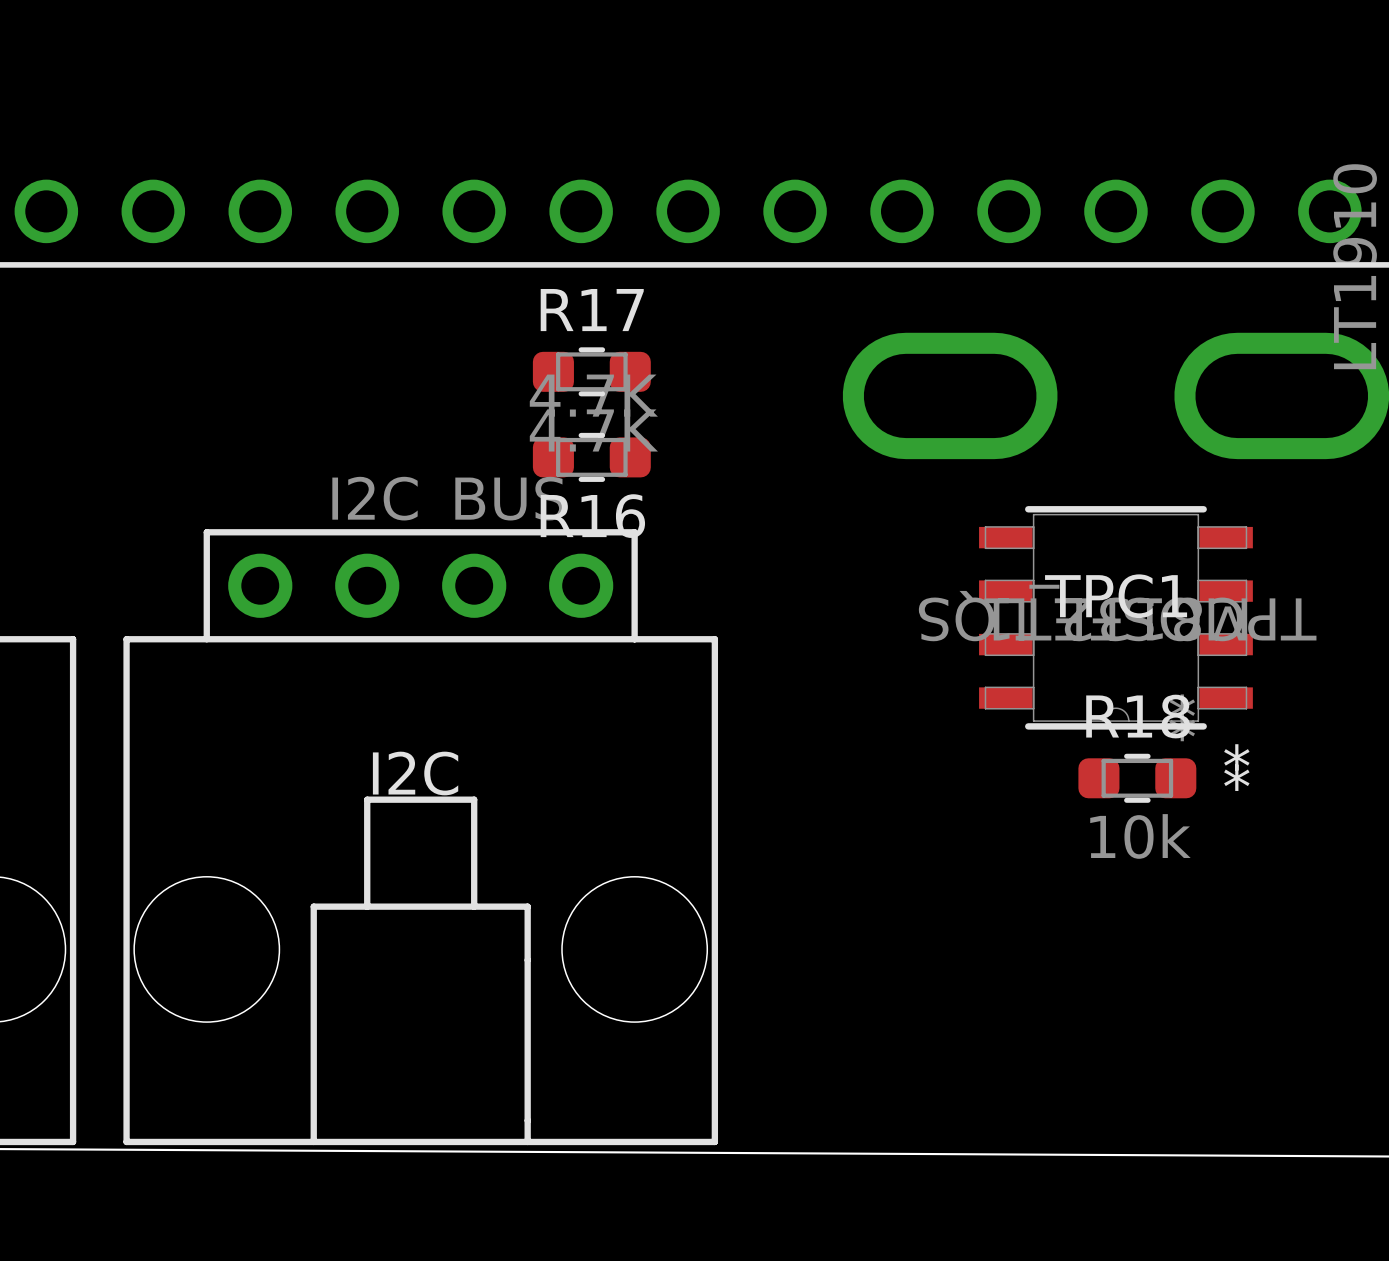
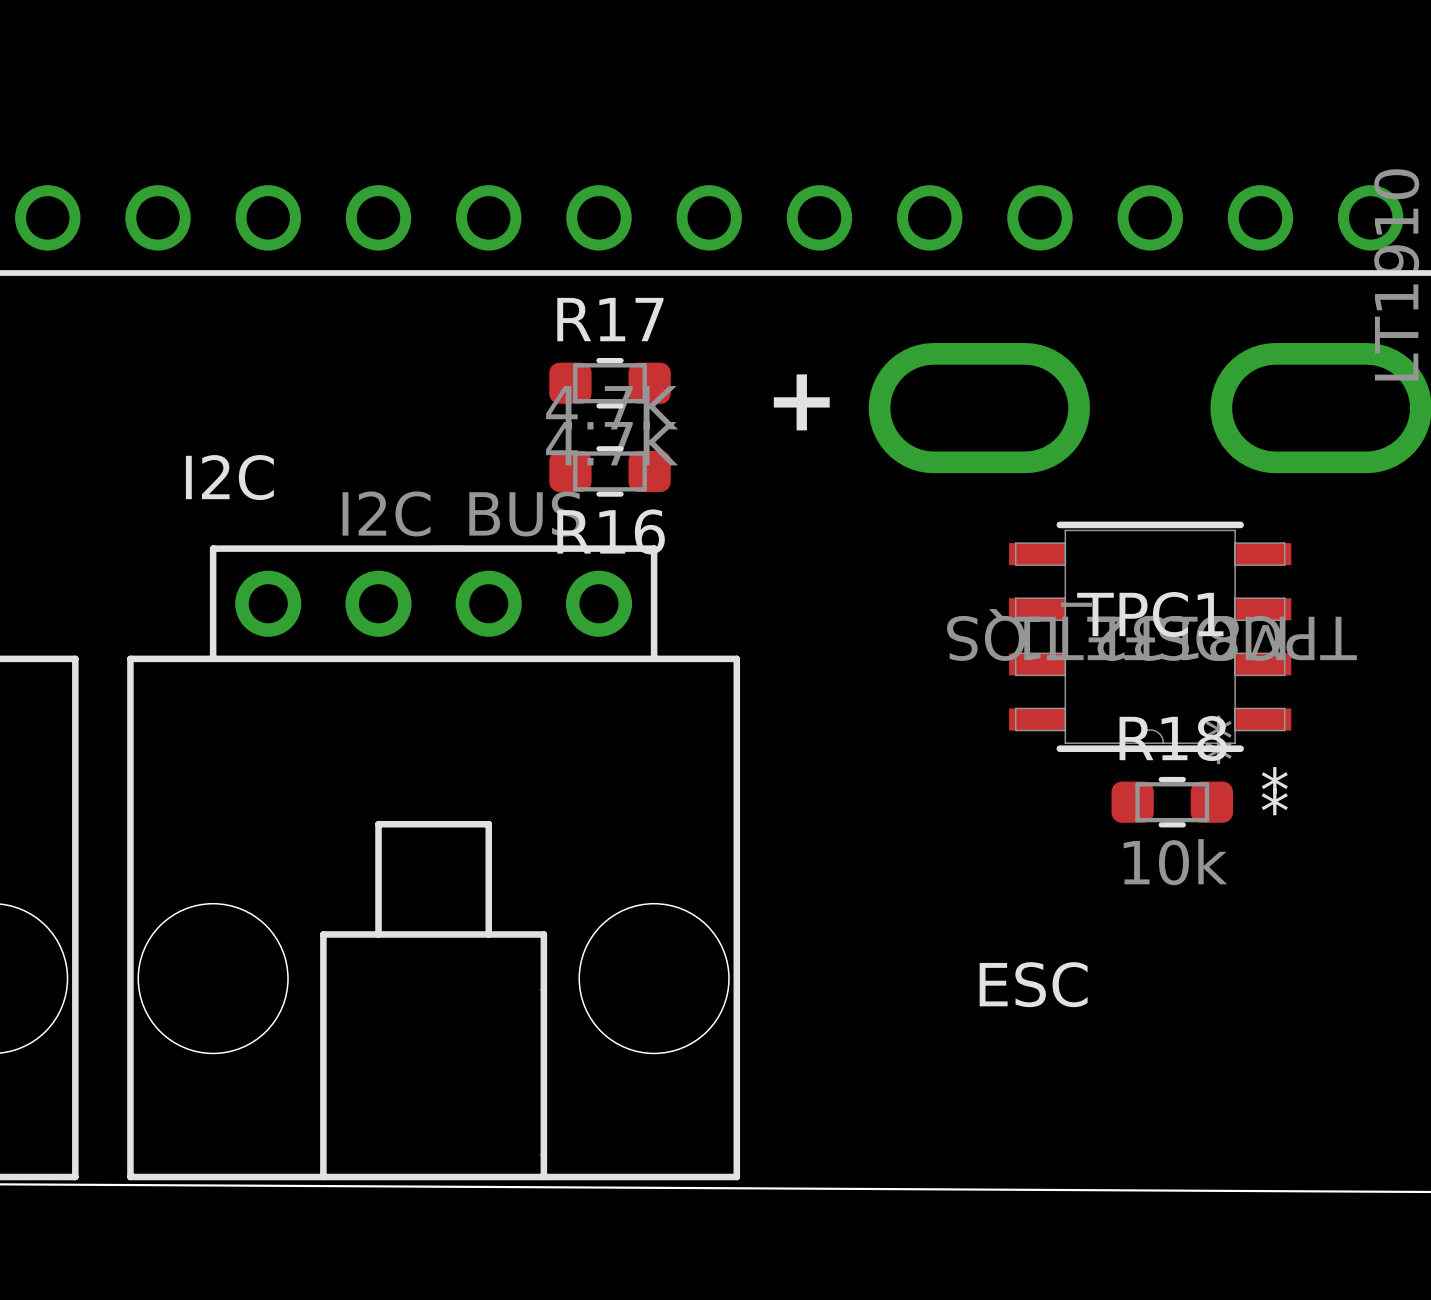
text: none -> + (801, 402)
text position: I2C (415, 773) -> I2C (229, 477)
text: none -> ESC (1033, 984)

